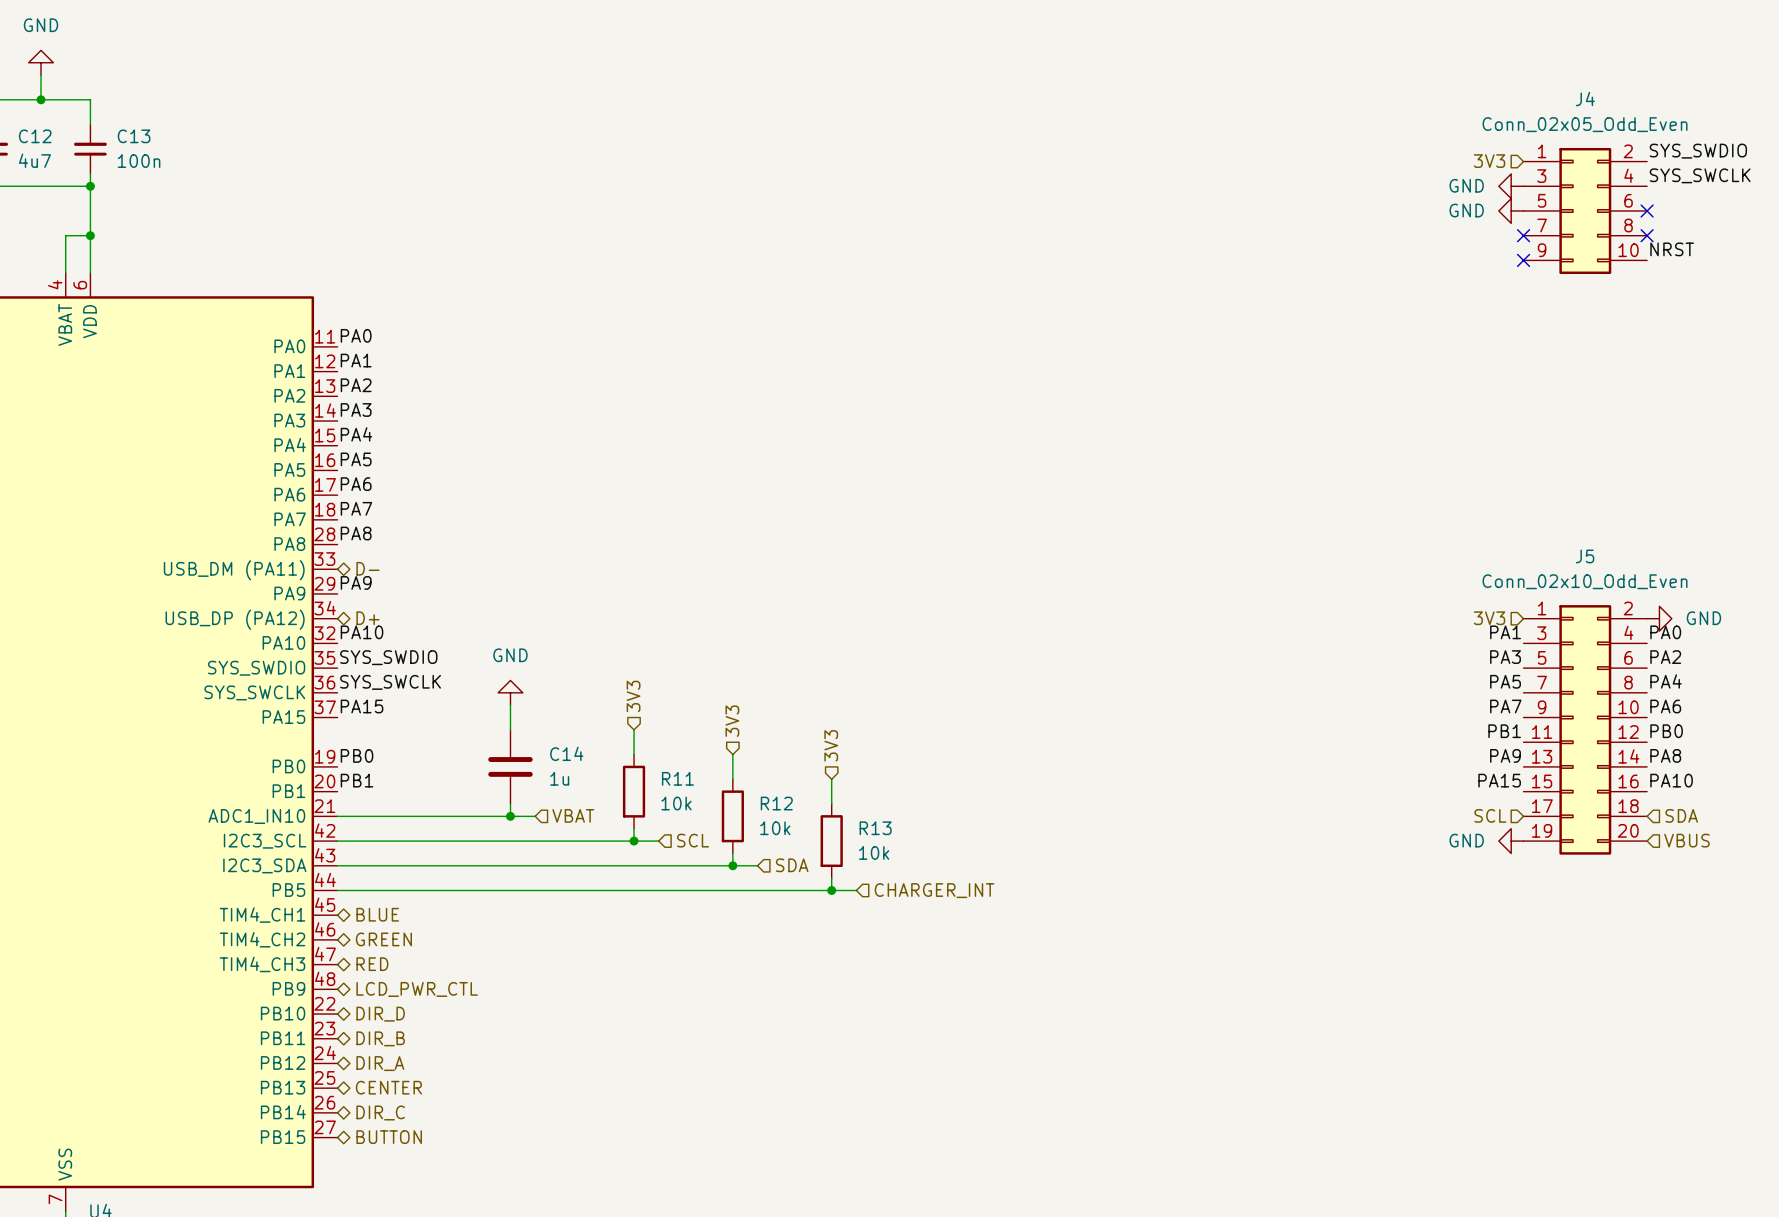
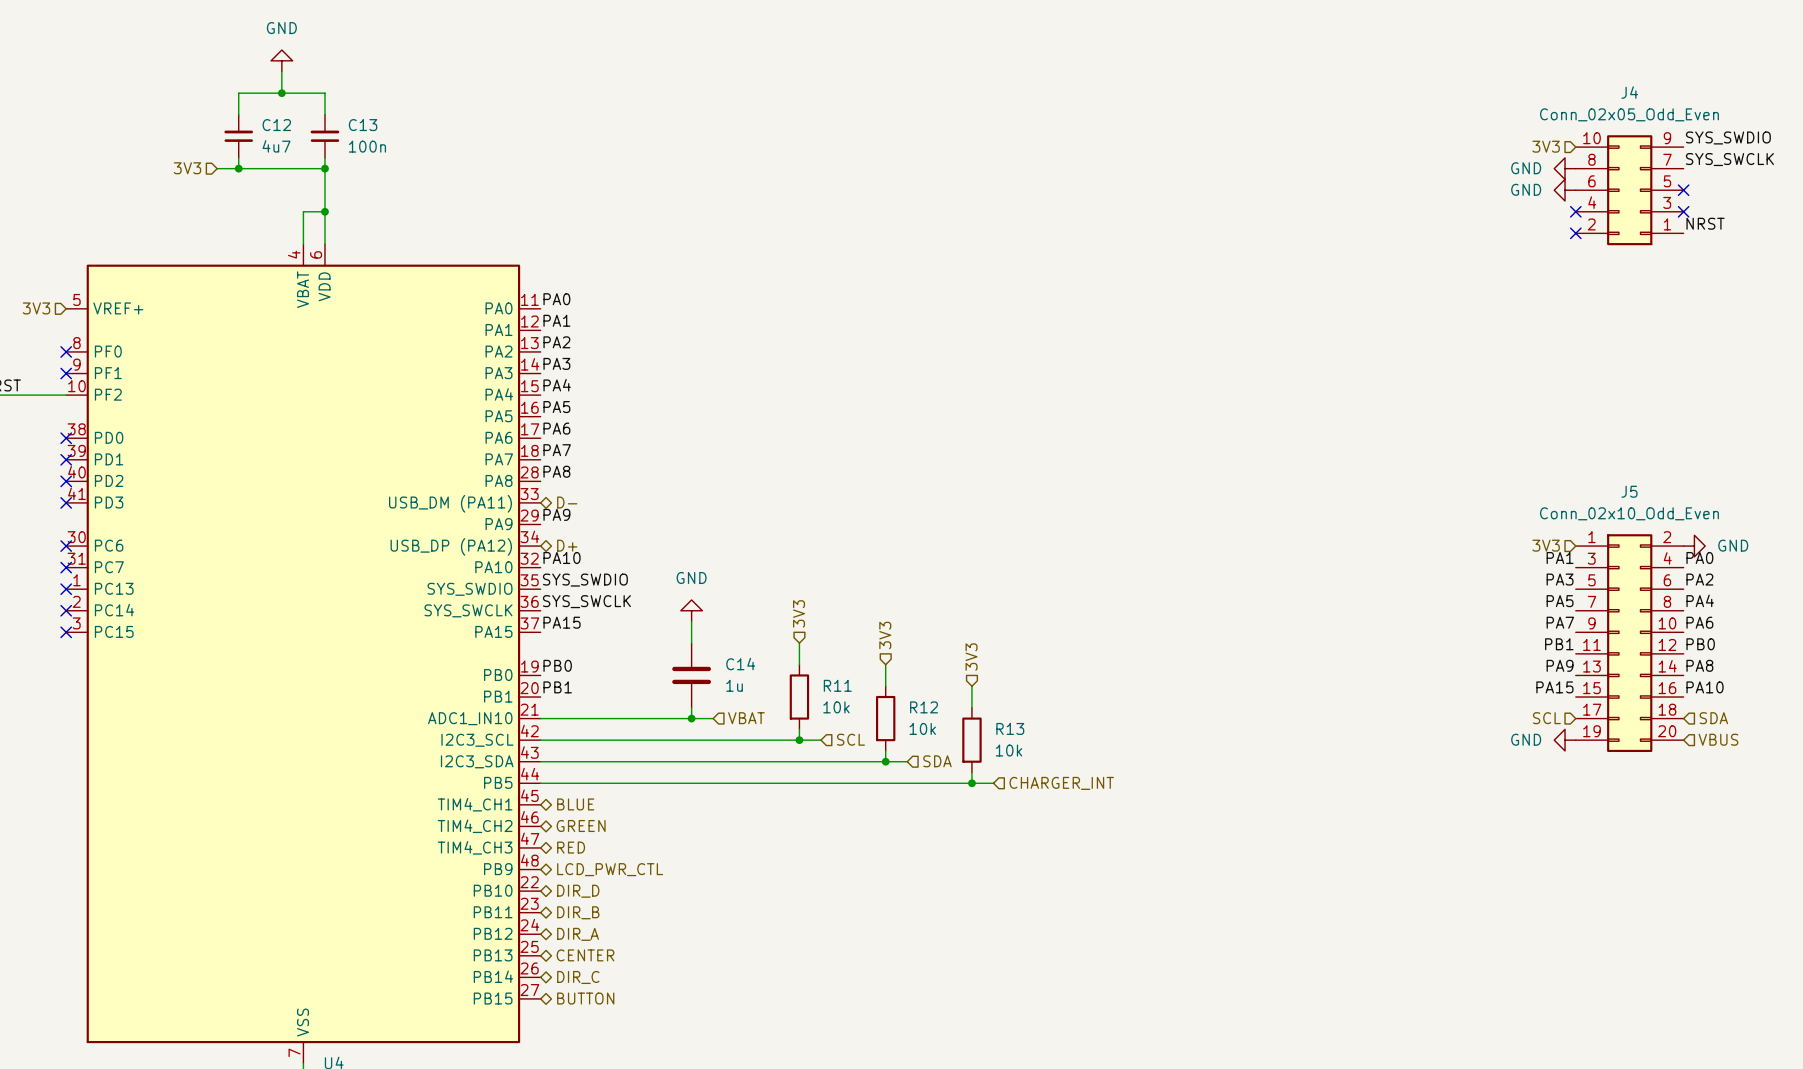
J4 rotation: 0° (1585, 210) -> 180° (1629, 190)

